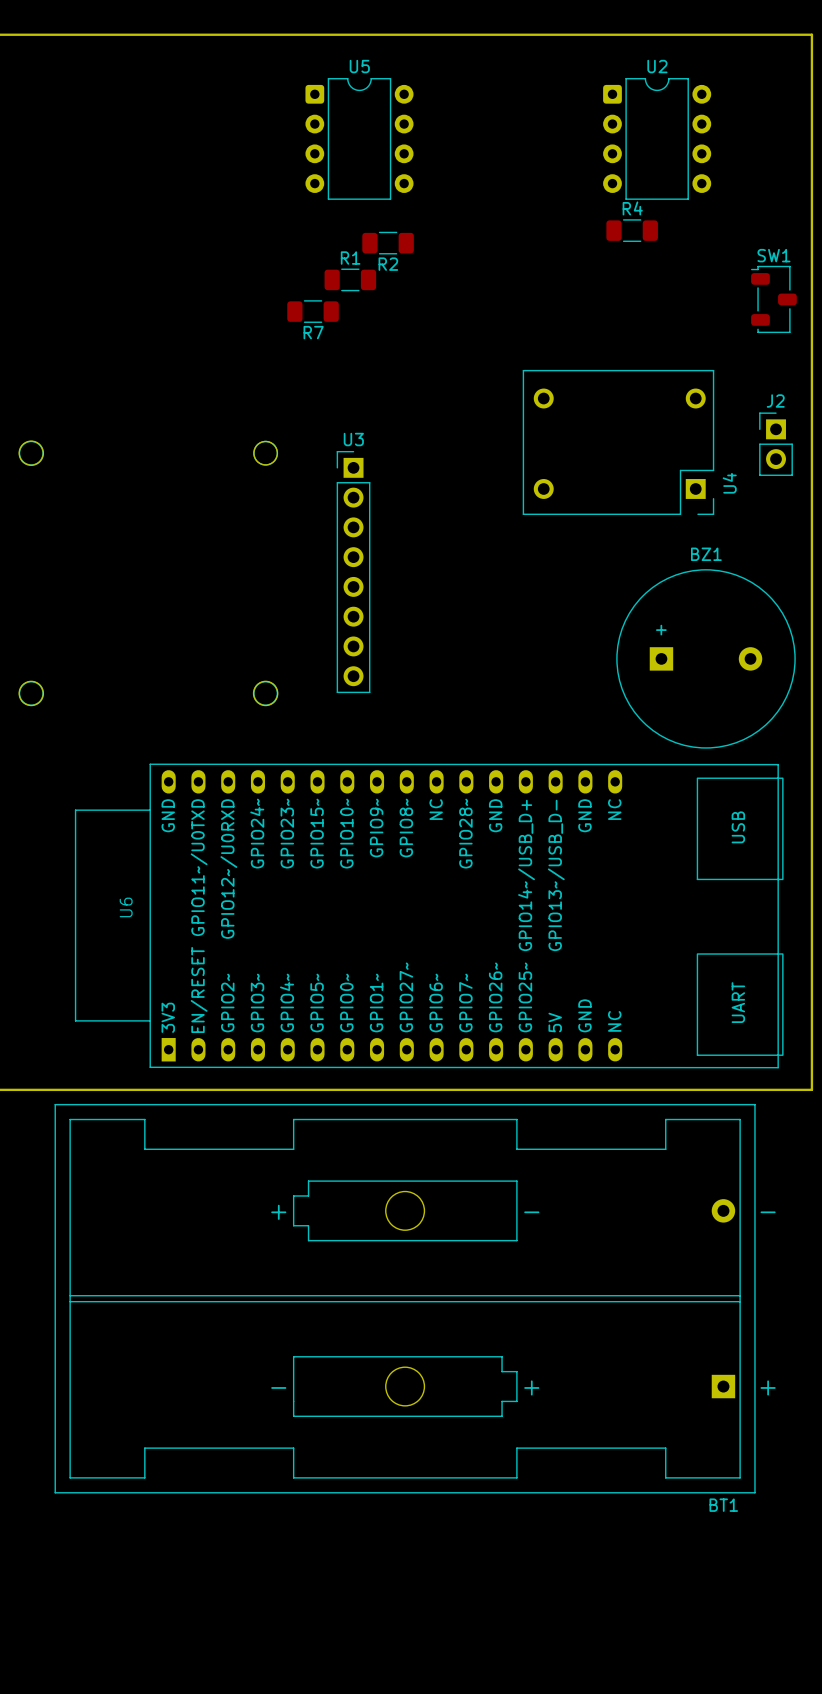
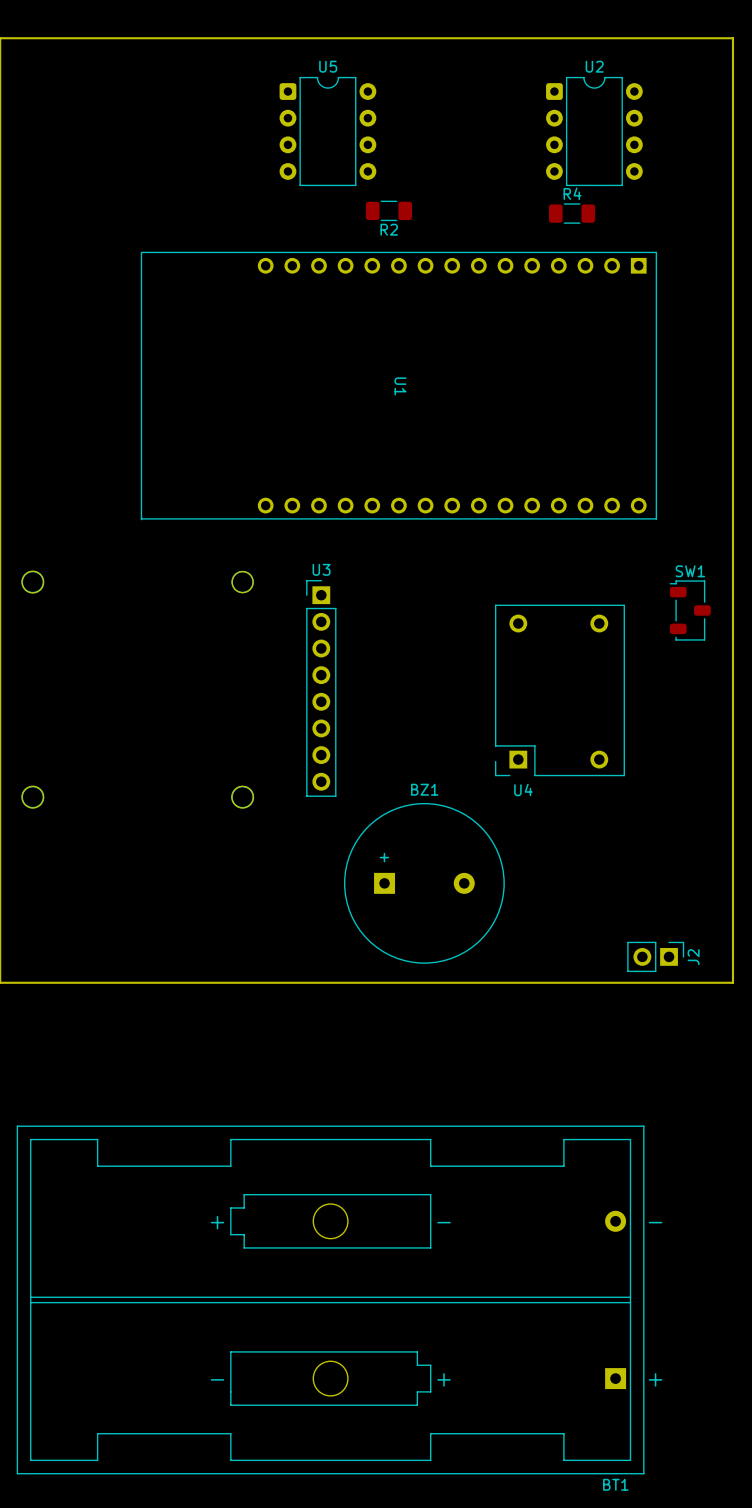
R2 position: (388, 243) -> (388, 210)
R1: (350, 279) -> none
SW1 position: (773, 299) -> (690, 610)
R7: (313, 311) -> none
U1: none -> (398, 386)
U4 rotation: 0° (618, 442) -> 90° clockwise (559, 690)
U4 position: (618, 442) -> (559, 690)
J2 rotation: 0° (776, 444) -> 90° clockwise (655, 956)
J2 position: (776, 444) -> (655, 956)
U3 position: (194, 573) -> (179, 689)
BZ1 position: (705, 658) -> (424, 883)
U6: (429, 915) -> none
BT1 position: (405, 1298) -> (330, 1299)

